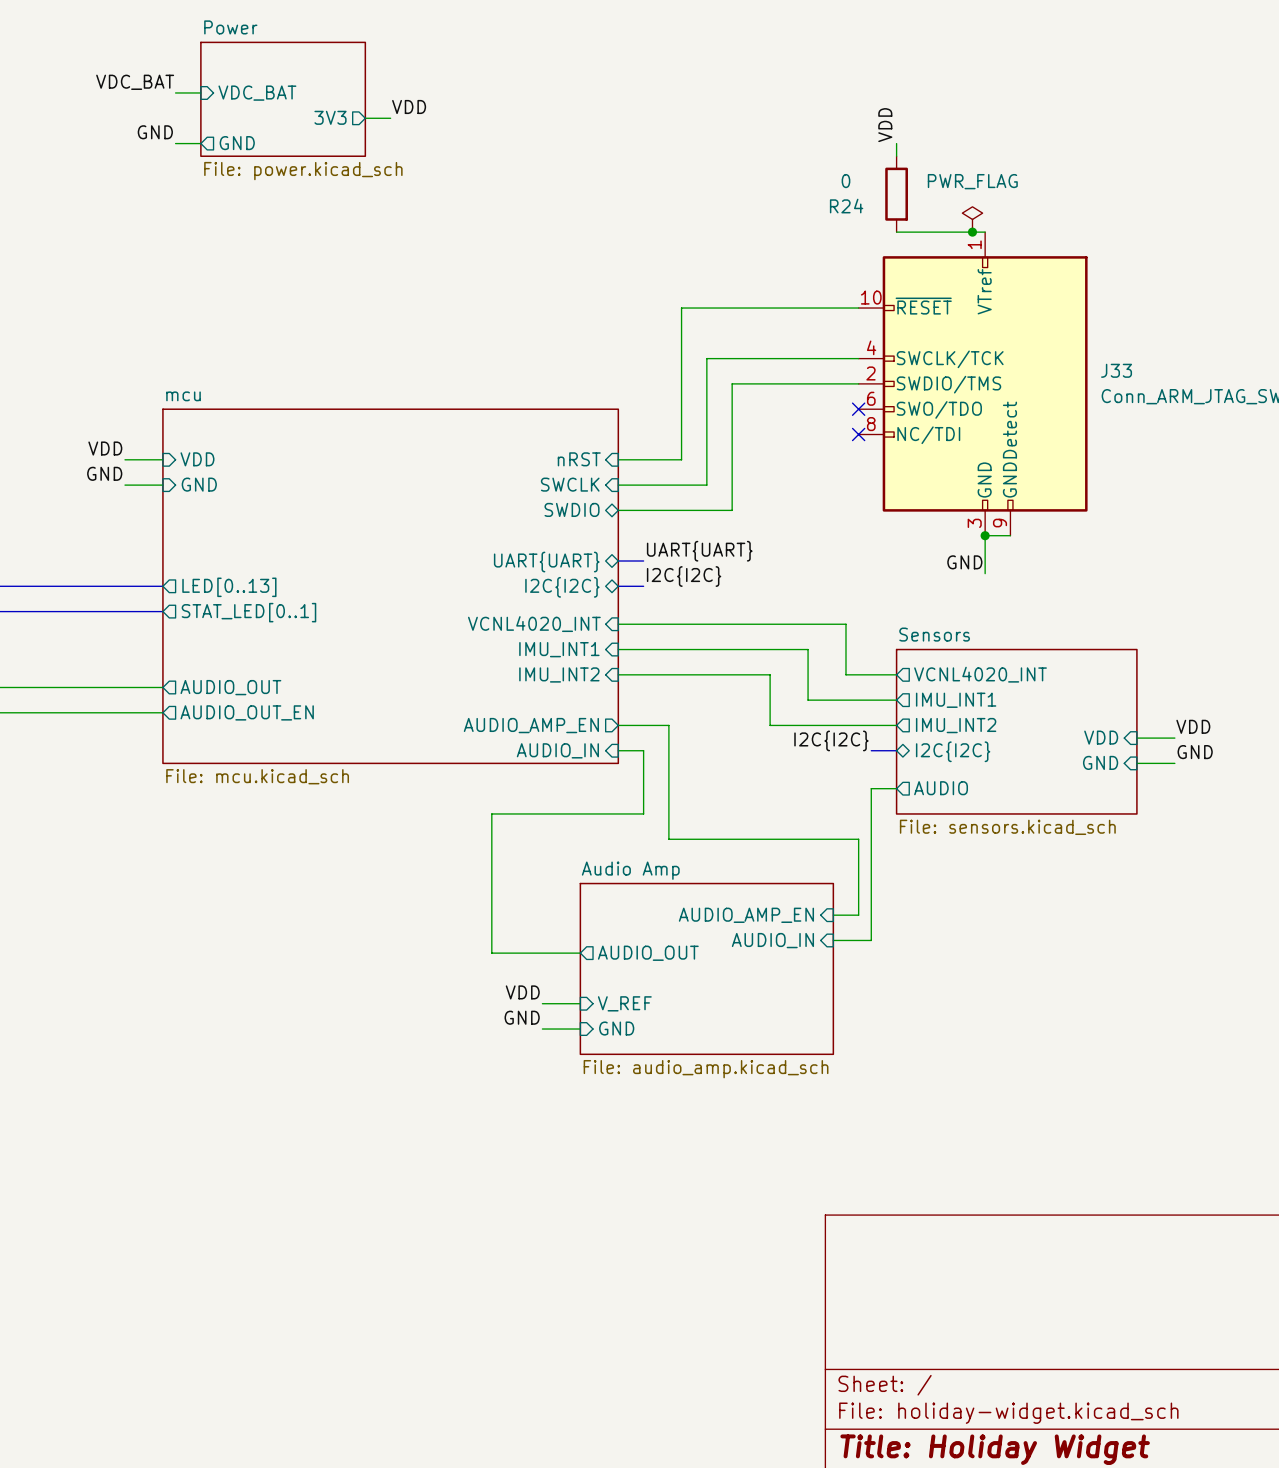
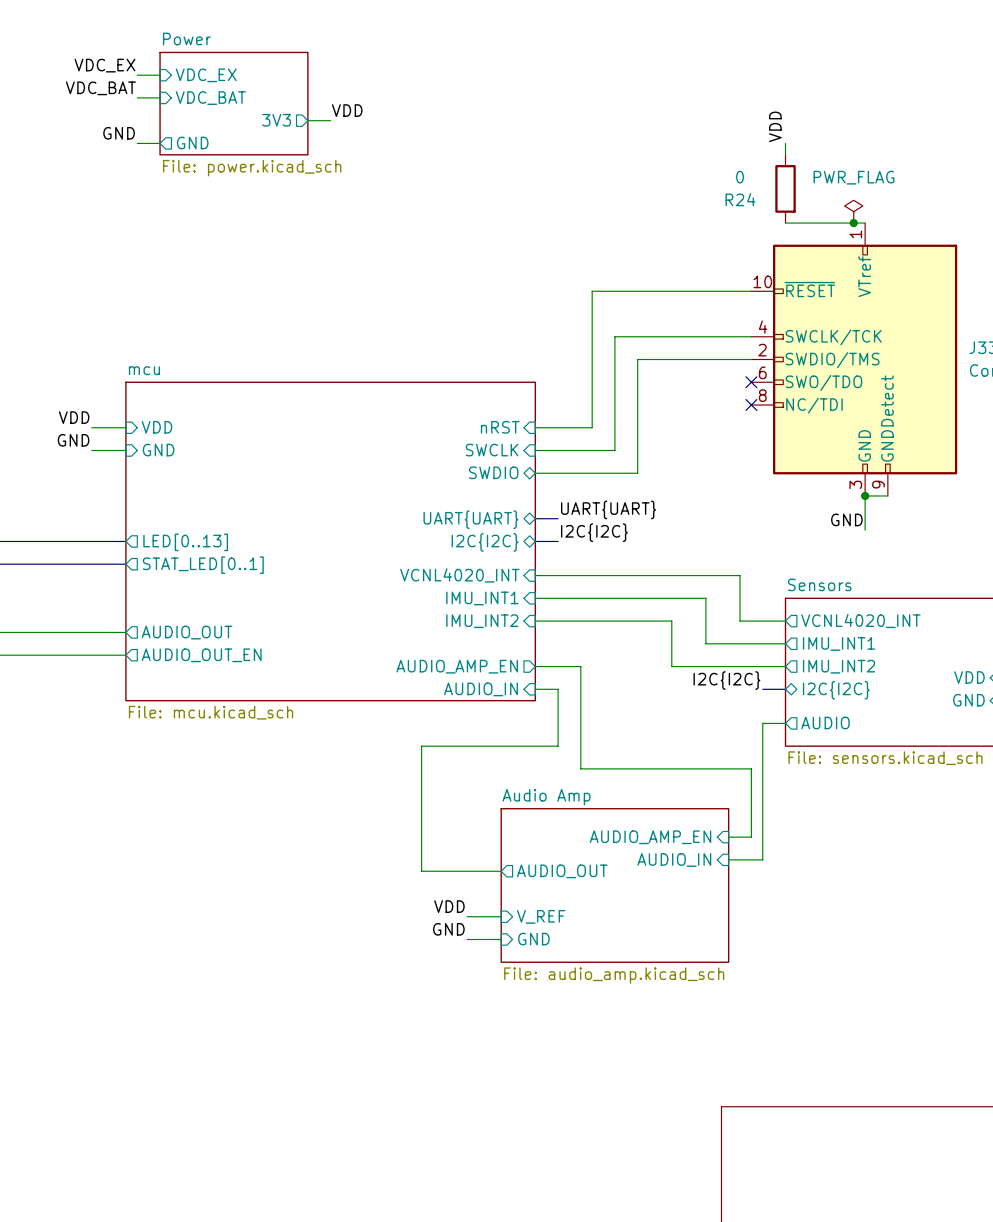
label: none -> VDC_EX (104, 65)
wire: none -> (137, 75) (160, 75)
sheet pin: none -> VDC_EX (206, 75)

